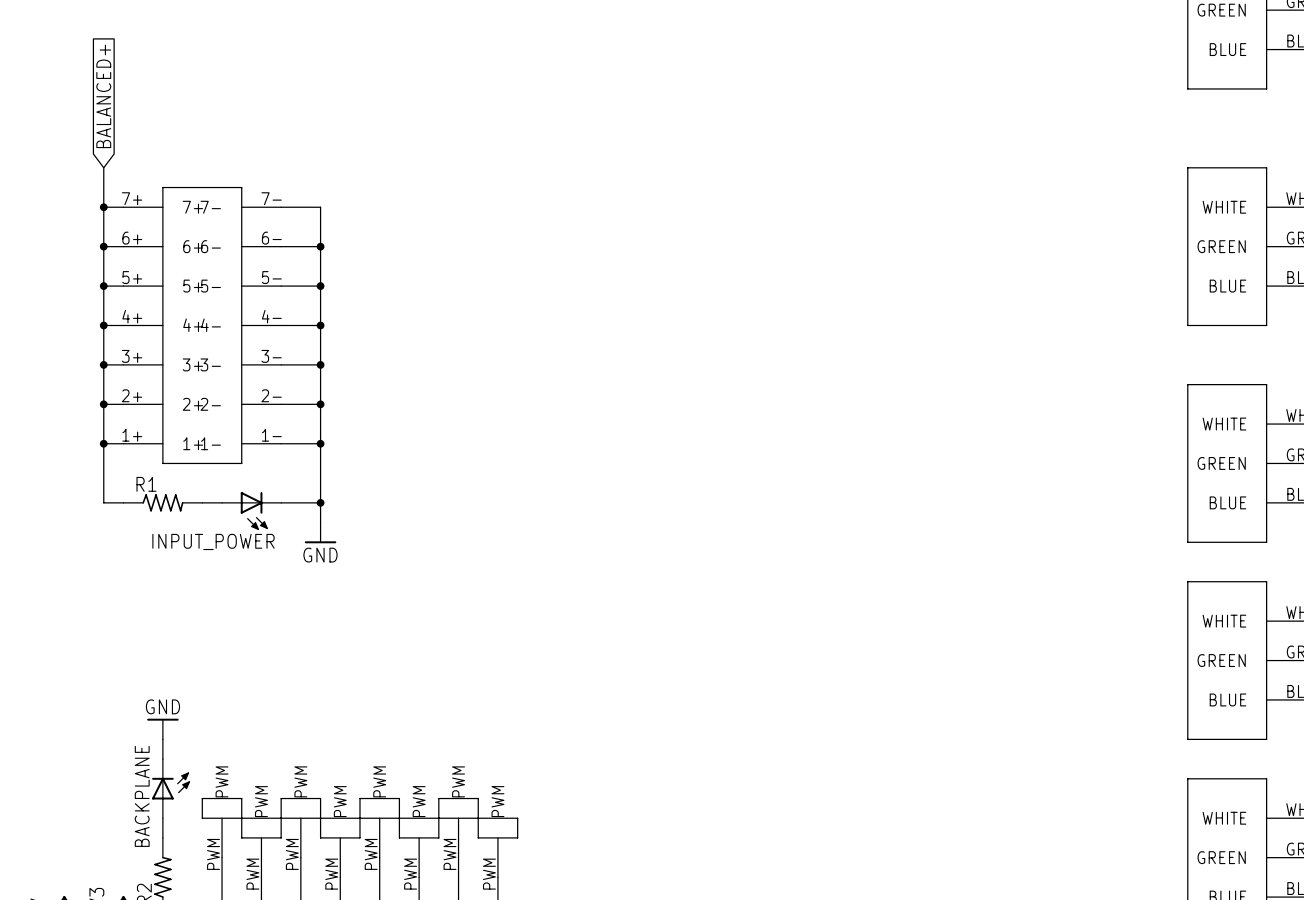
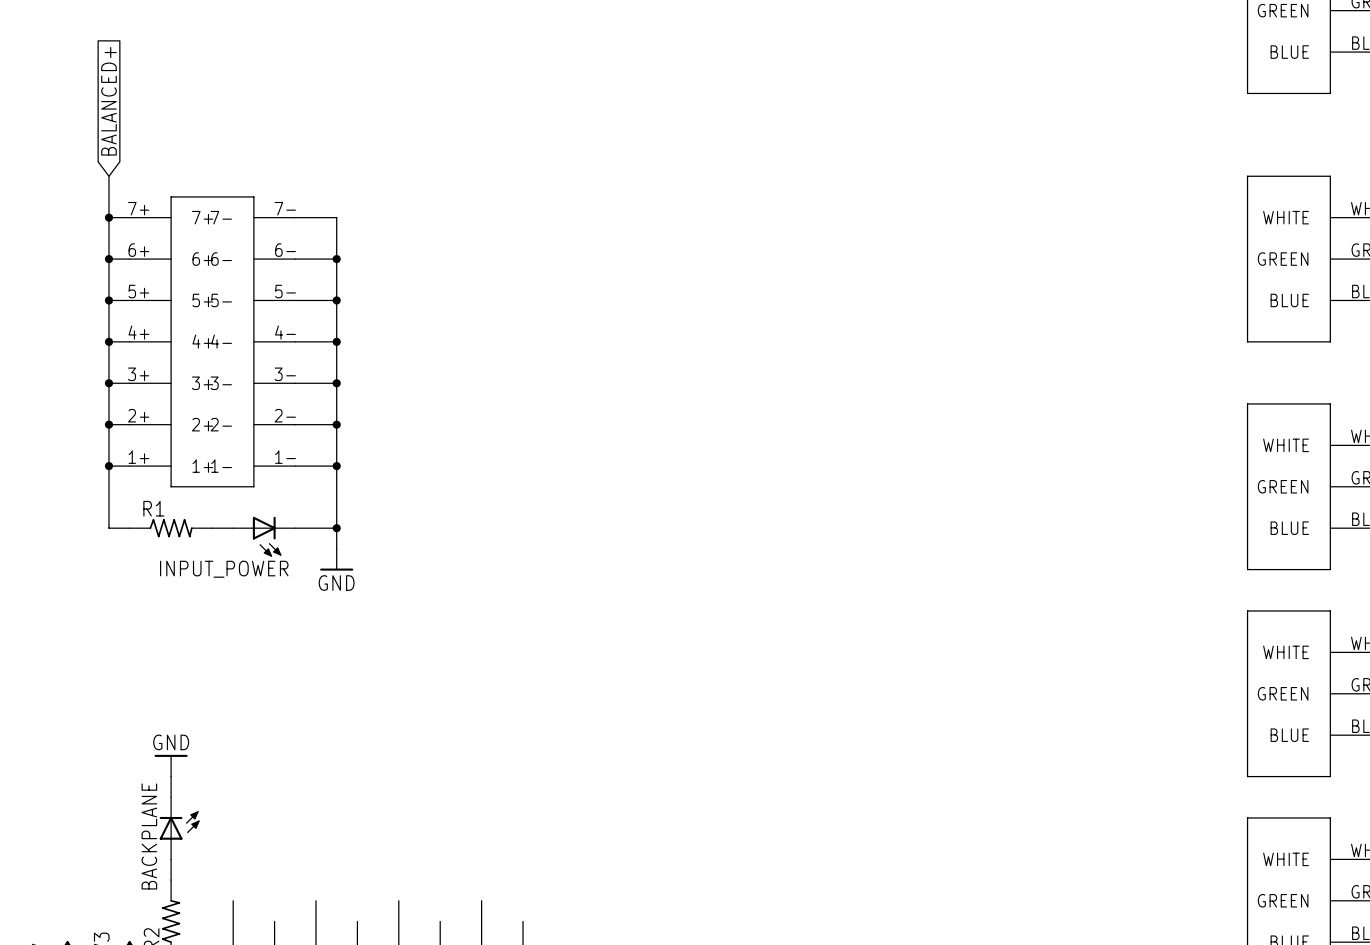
part: (222, 827) -> none
part: (300, 827) -> none
part: (379, 827) -> none
part: (458, 827) -> none
part: (261, 847) -> none
part: (340, 847) -> none
part: (419, 847) -> none
part: (497, 847) -> none

